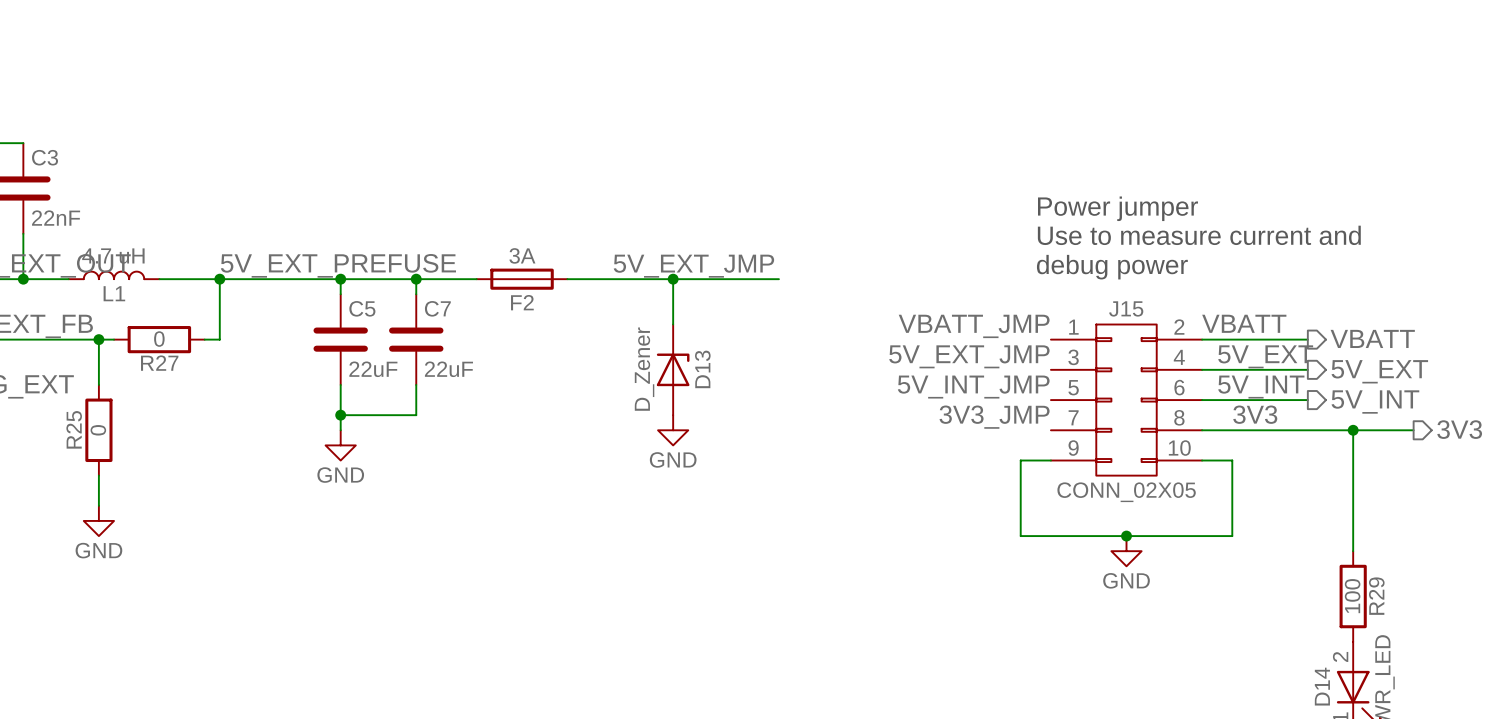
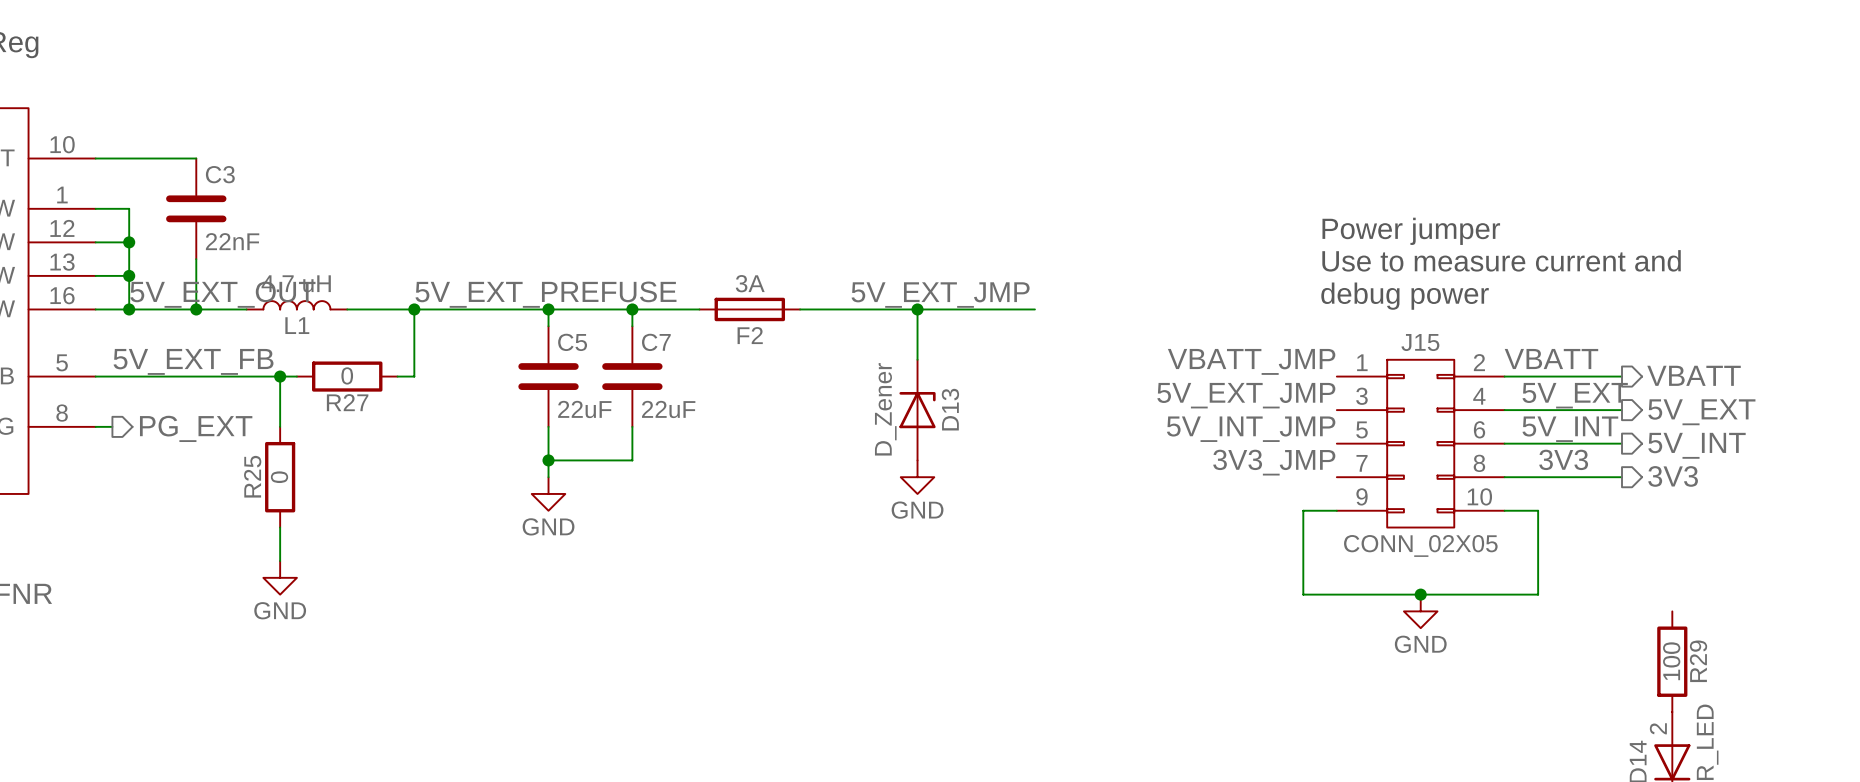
hierarchical label position: 3V3 (1459, 429) -> 3V3 (1673, 476)
wire: (1307, 430) (1413, 430) -> none
wire: (1353, 430) (1353, 551) -> none
junction: (1353, 430) -> none

